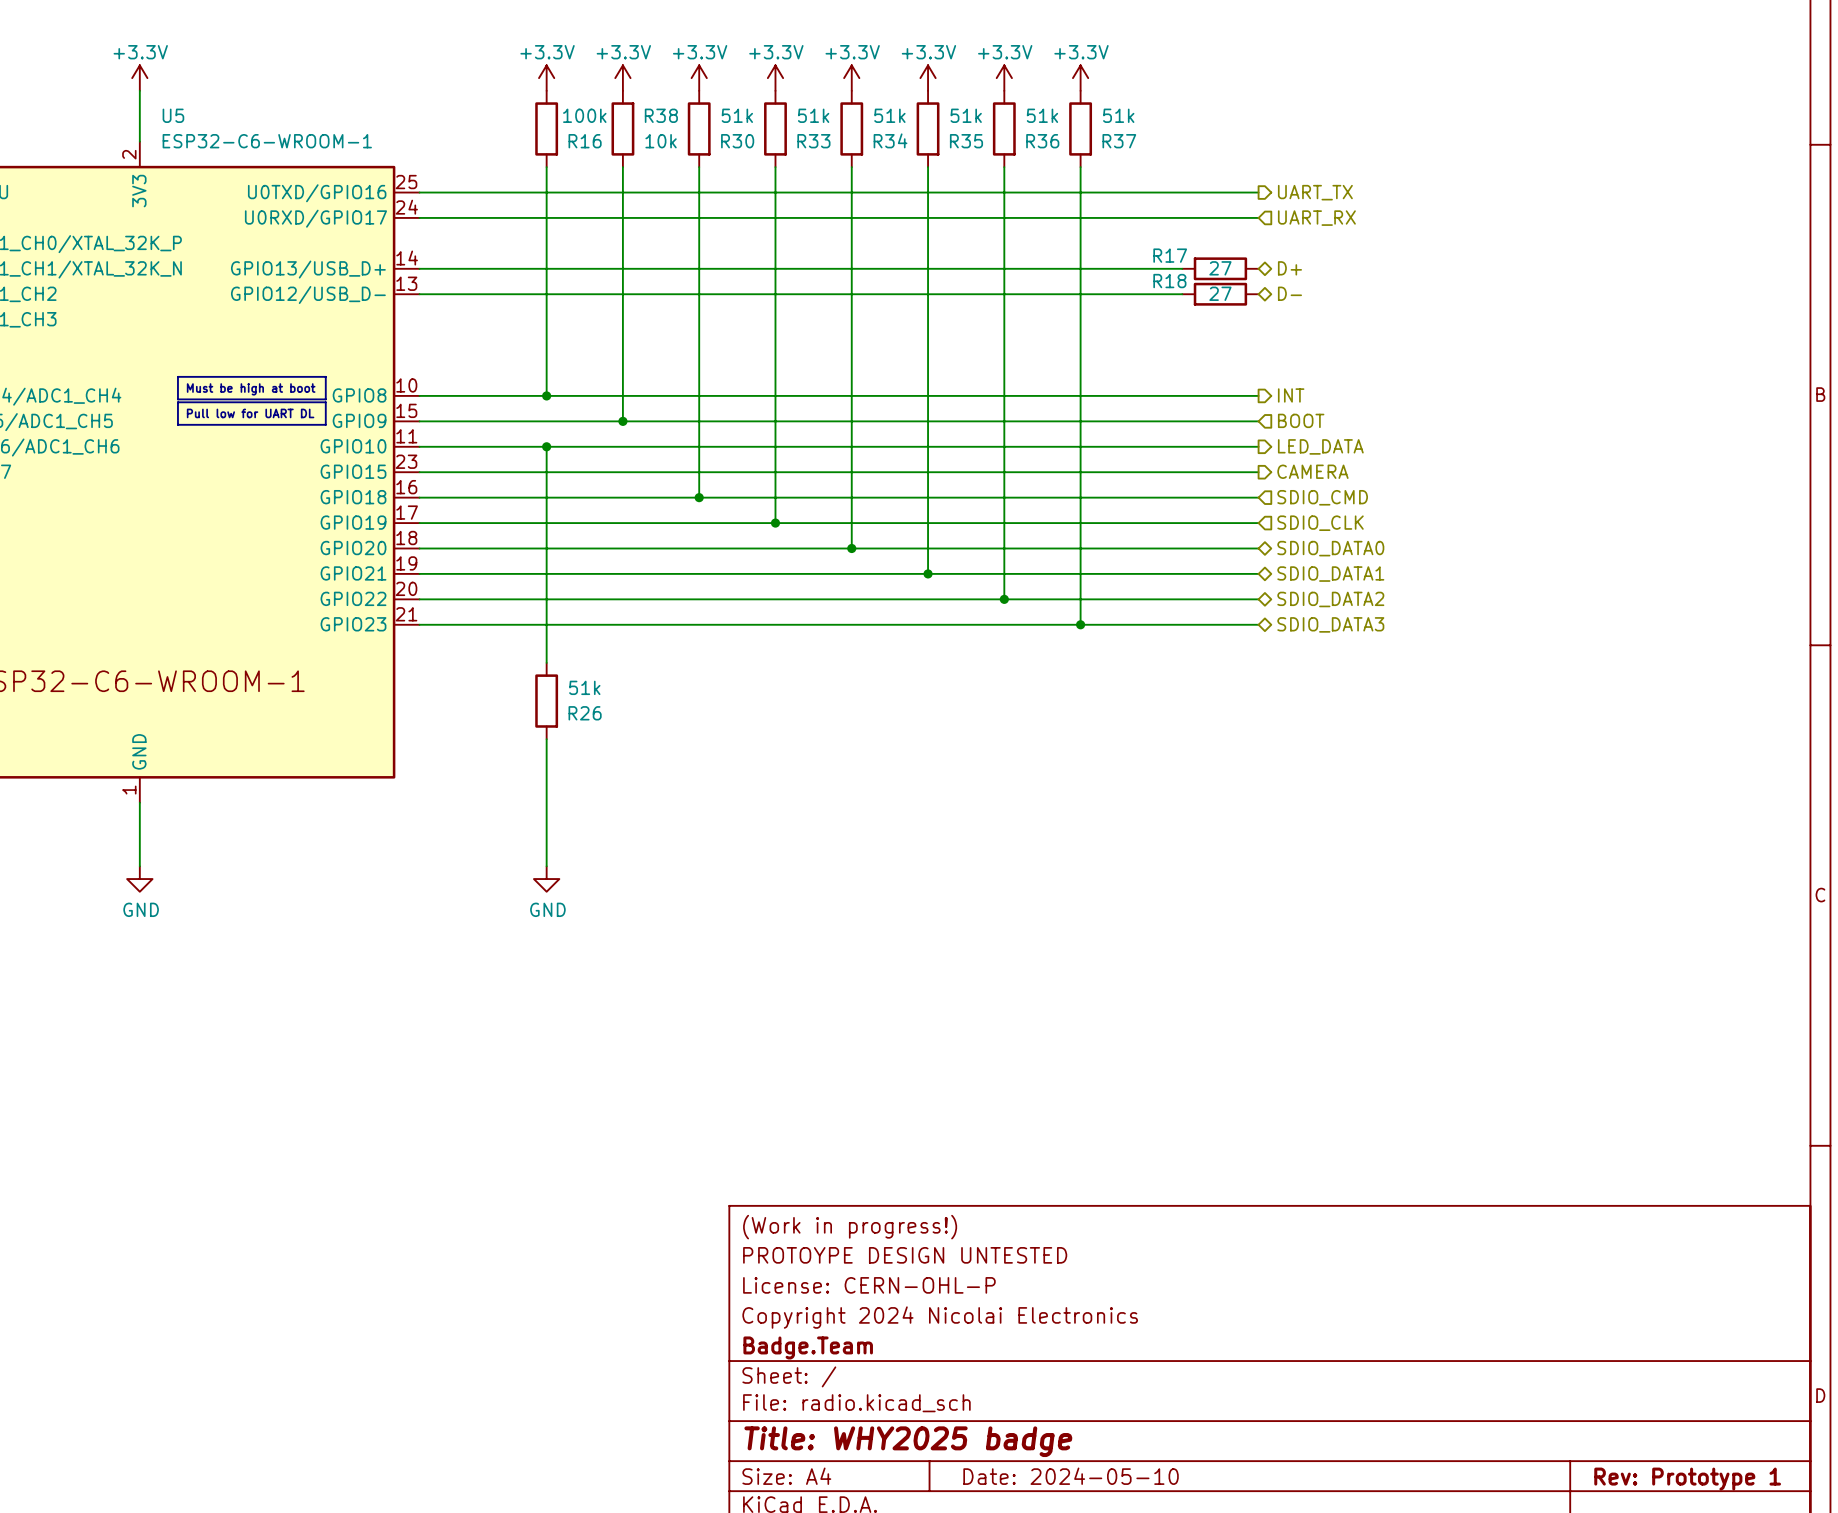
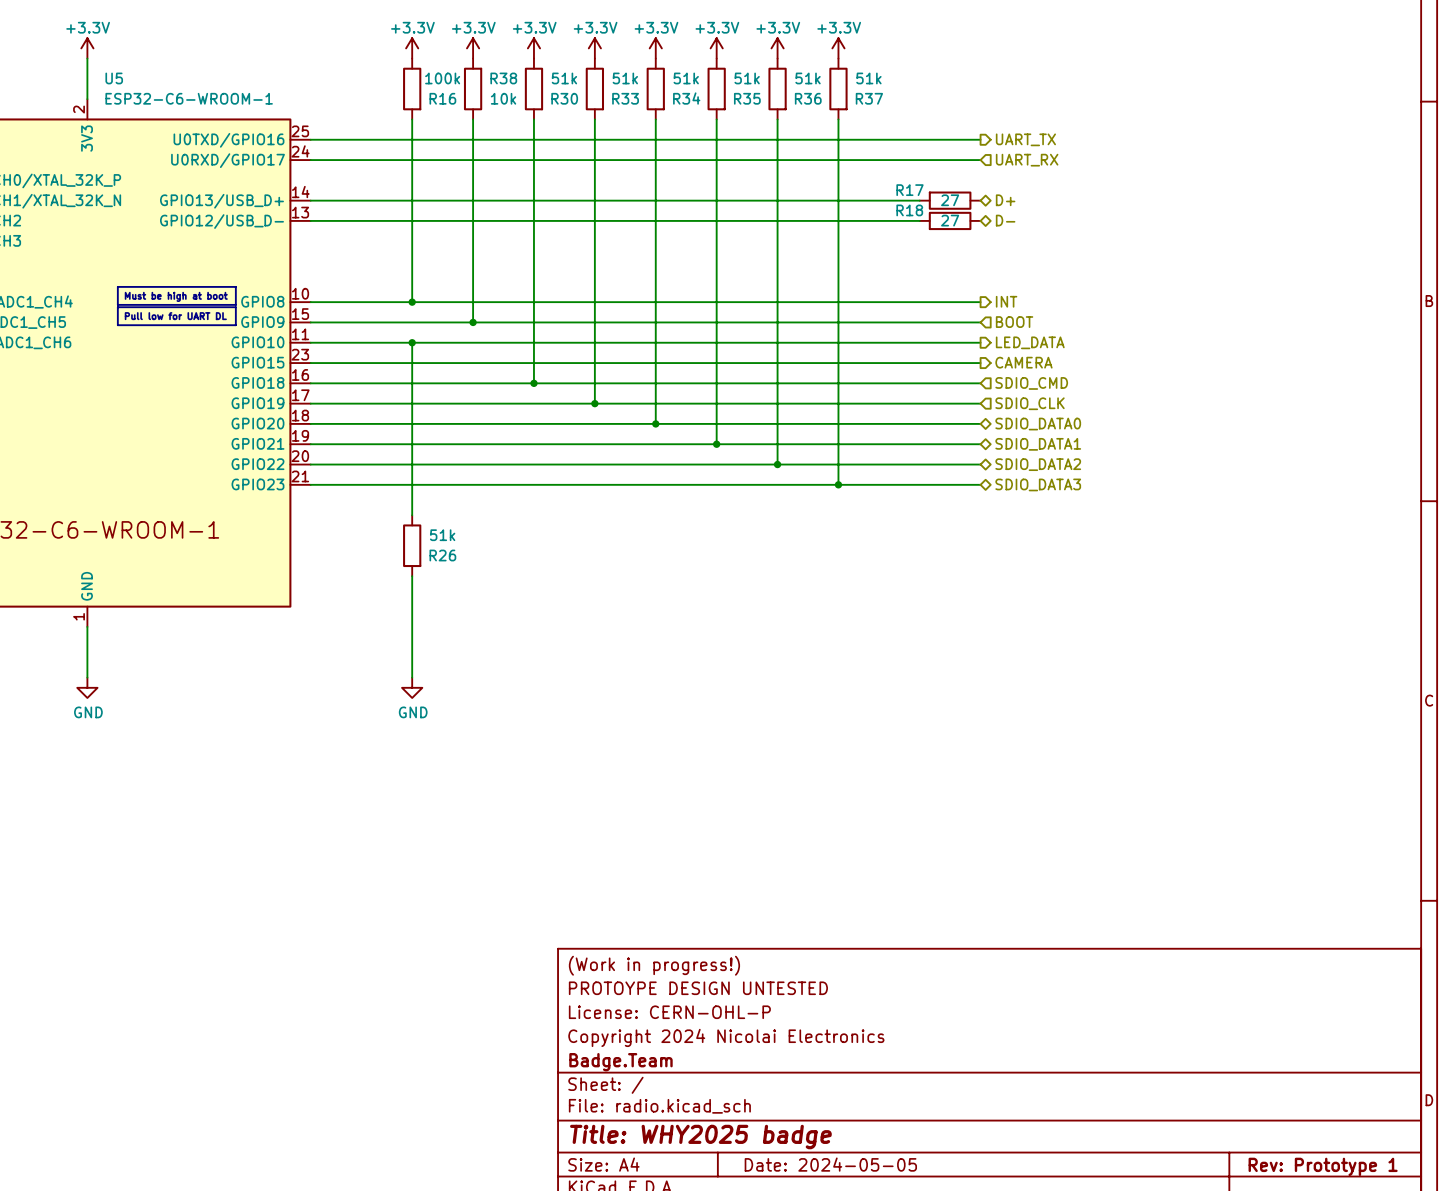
title block: Date: 2024-05-10 (1071, 1476) -> Date: 2024-05-05 (830, 1164)

